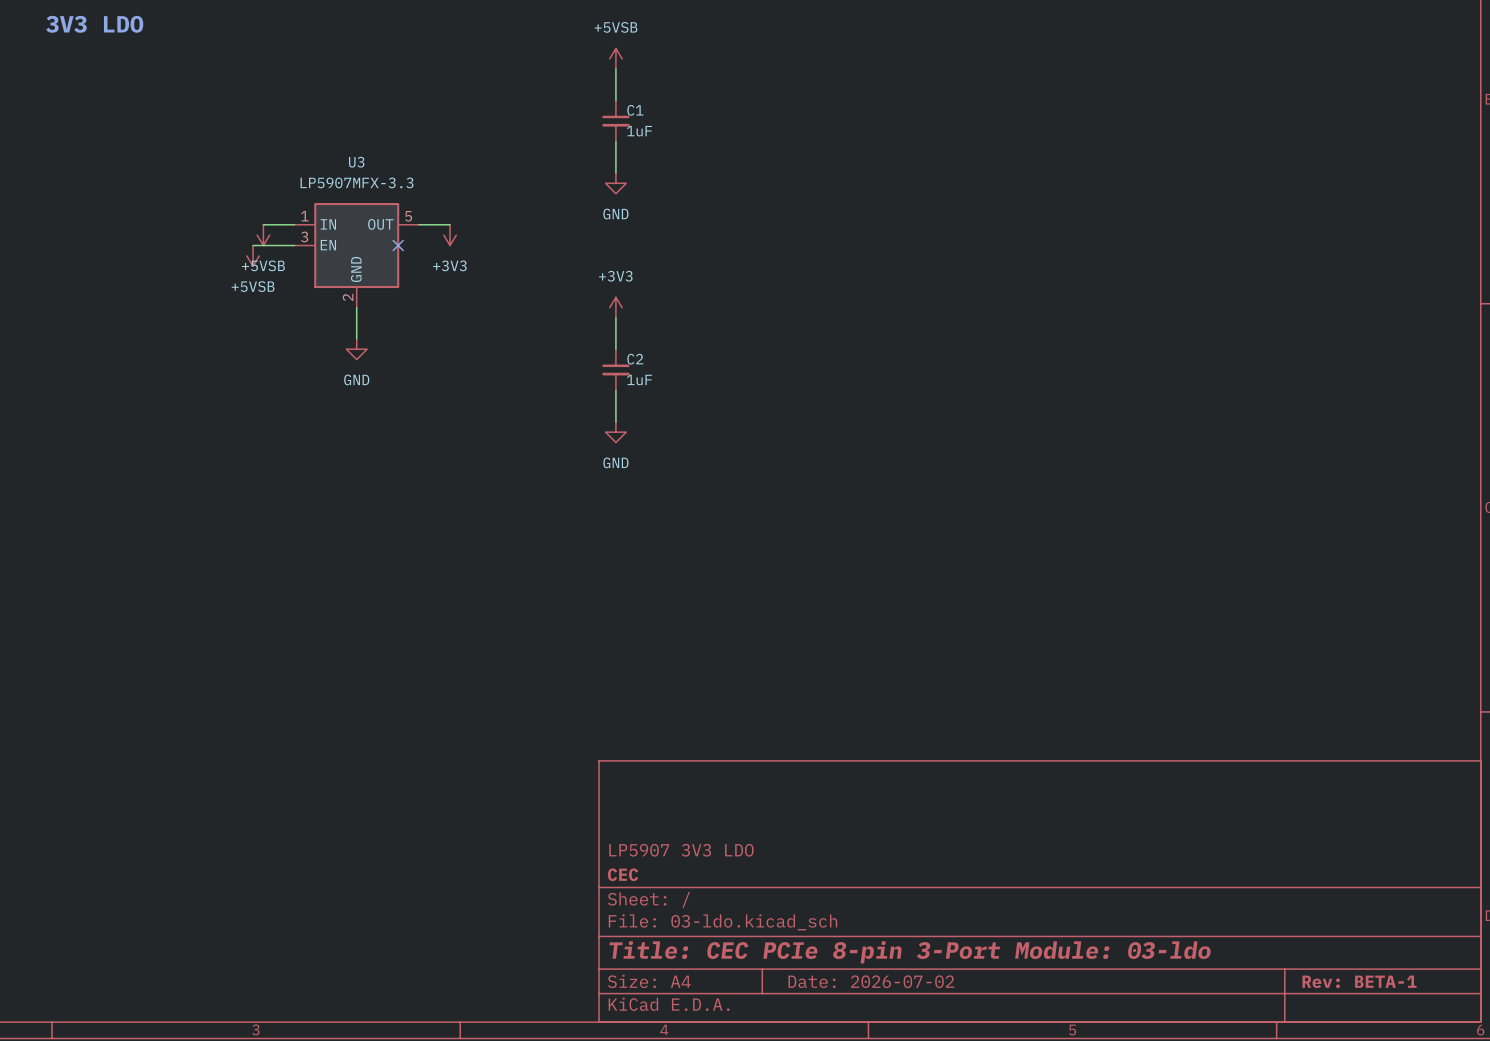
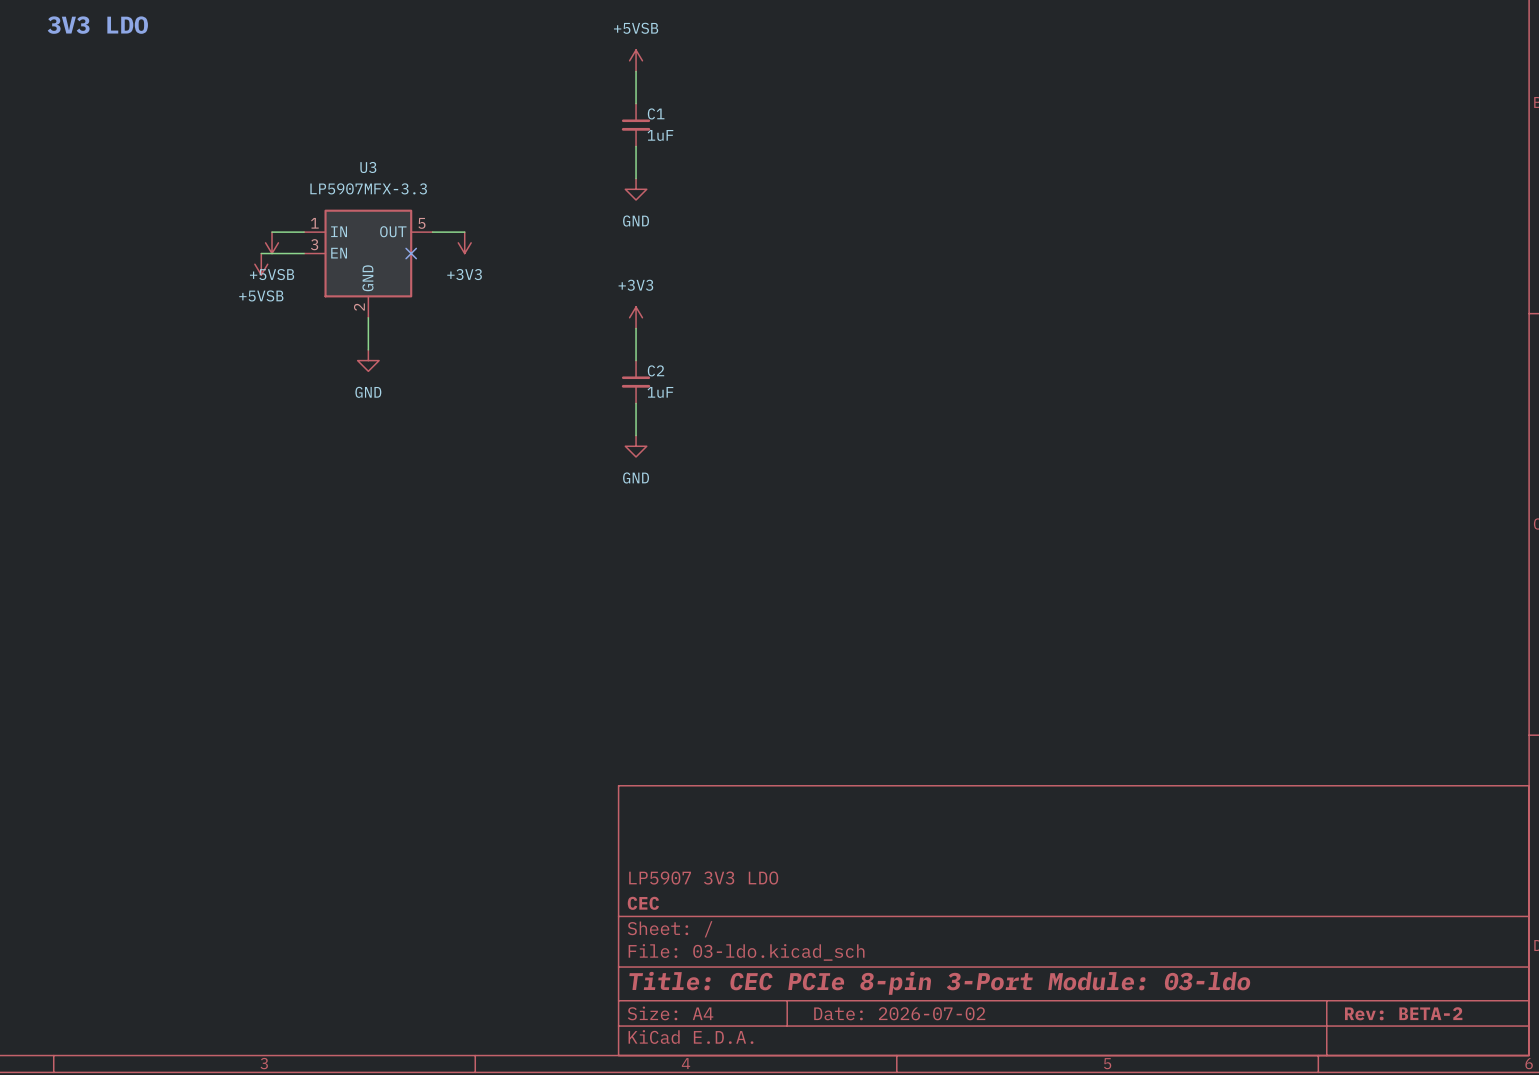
title block: Rev: BETA-1 (1359, 981) -> Rev: BETA-2 (1403, 1013)

